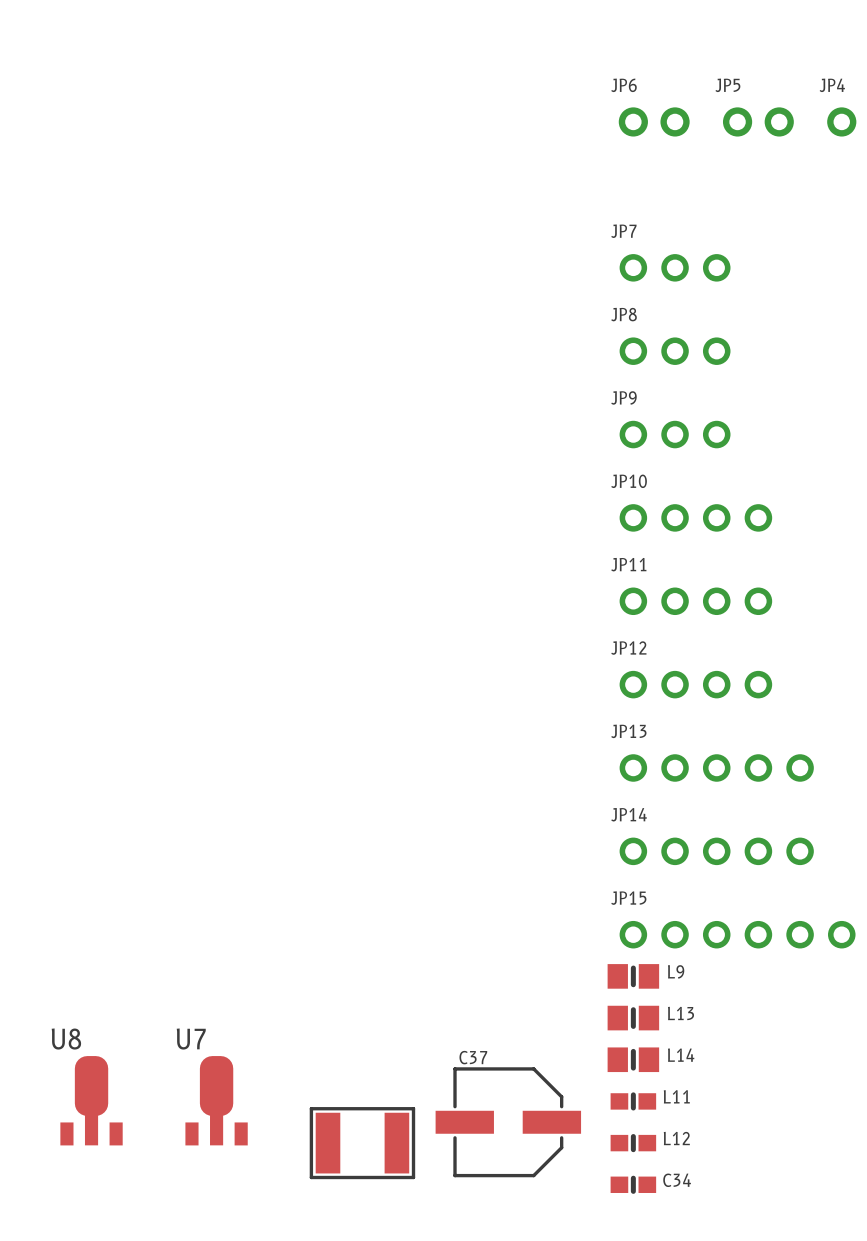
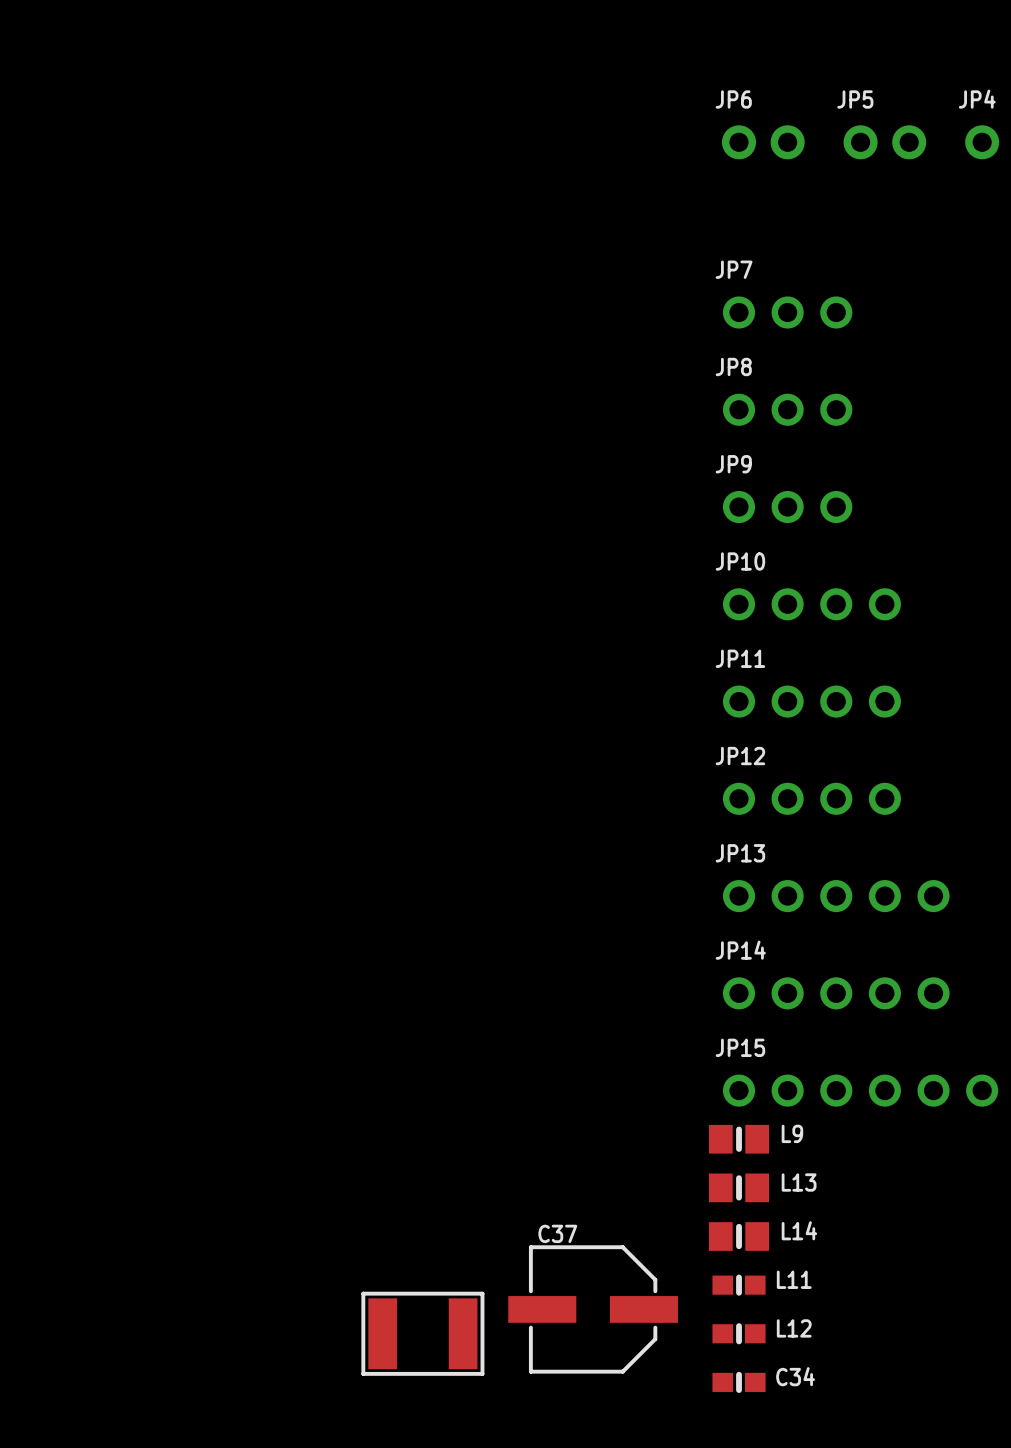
U8: (91, 1100) -> none
U7: (216, 1100) -> none

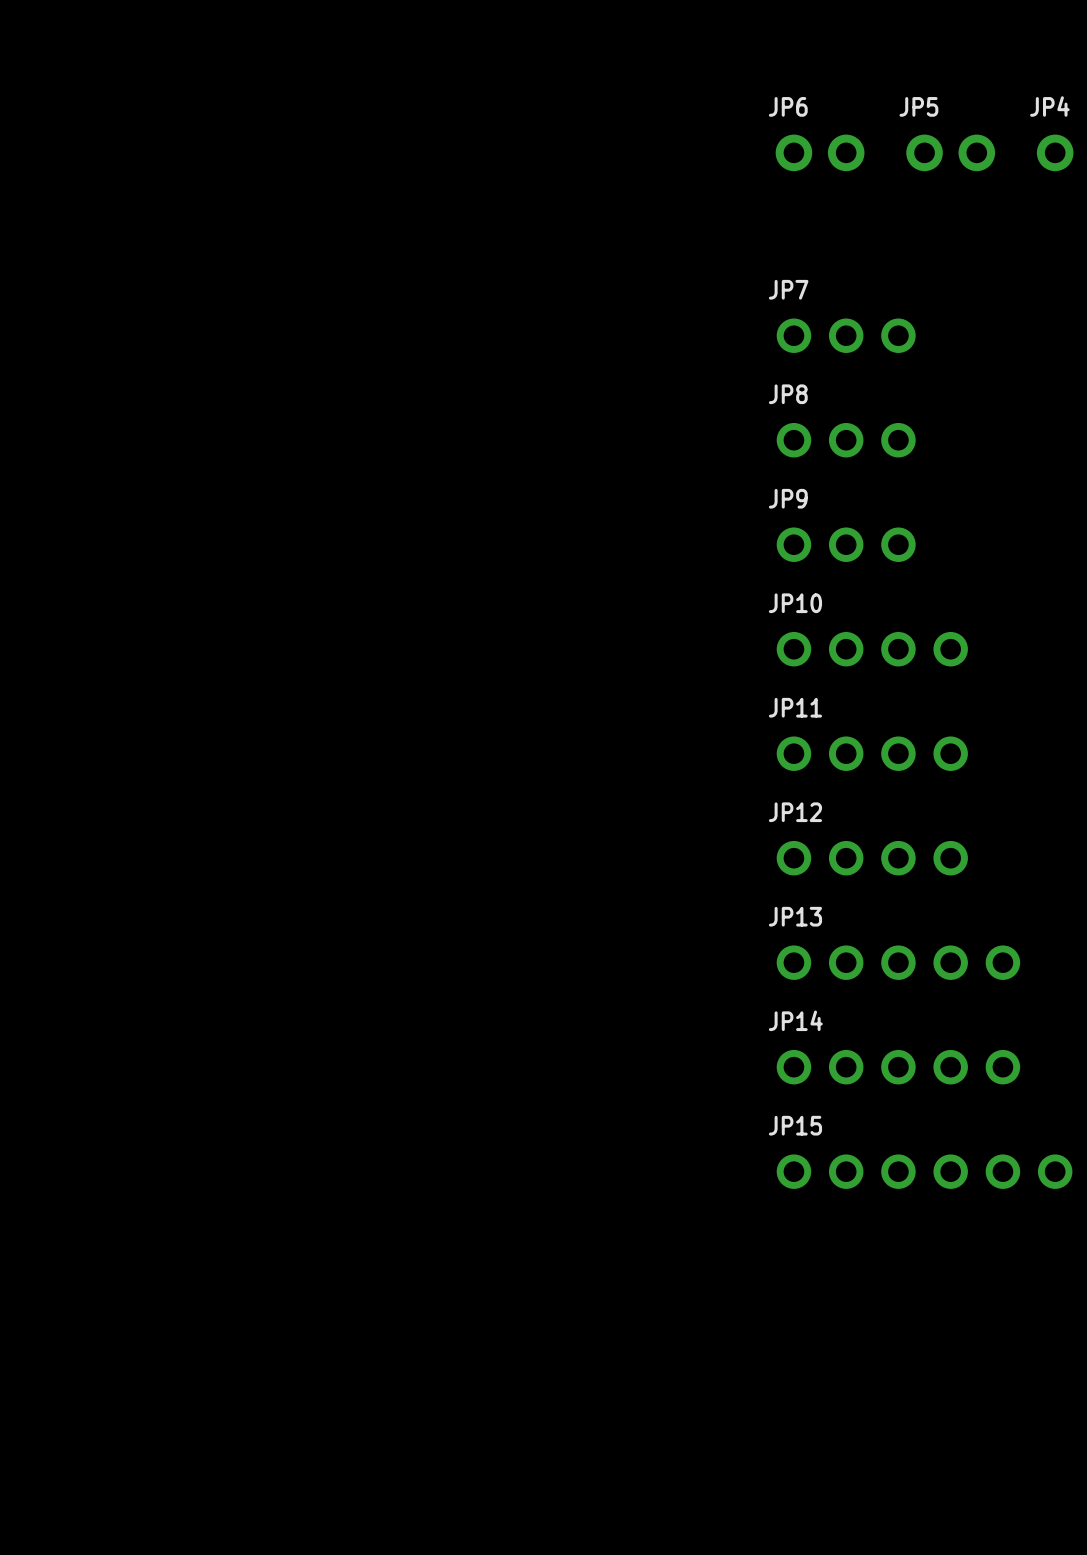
L9: (739, 1139) -> none
L13: (739, 1187) -> none
L14: (739, 1236) -> none
L11: (739, 1285) -> none
C37: (593, 1309) -> none
part: (422, 1333) -> none
L12: (739, 1333) -> none
C34: (739, 1382) -> none

